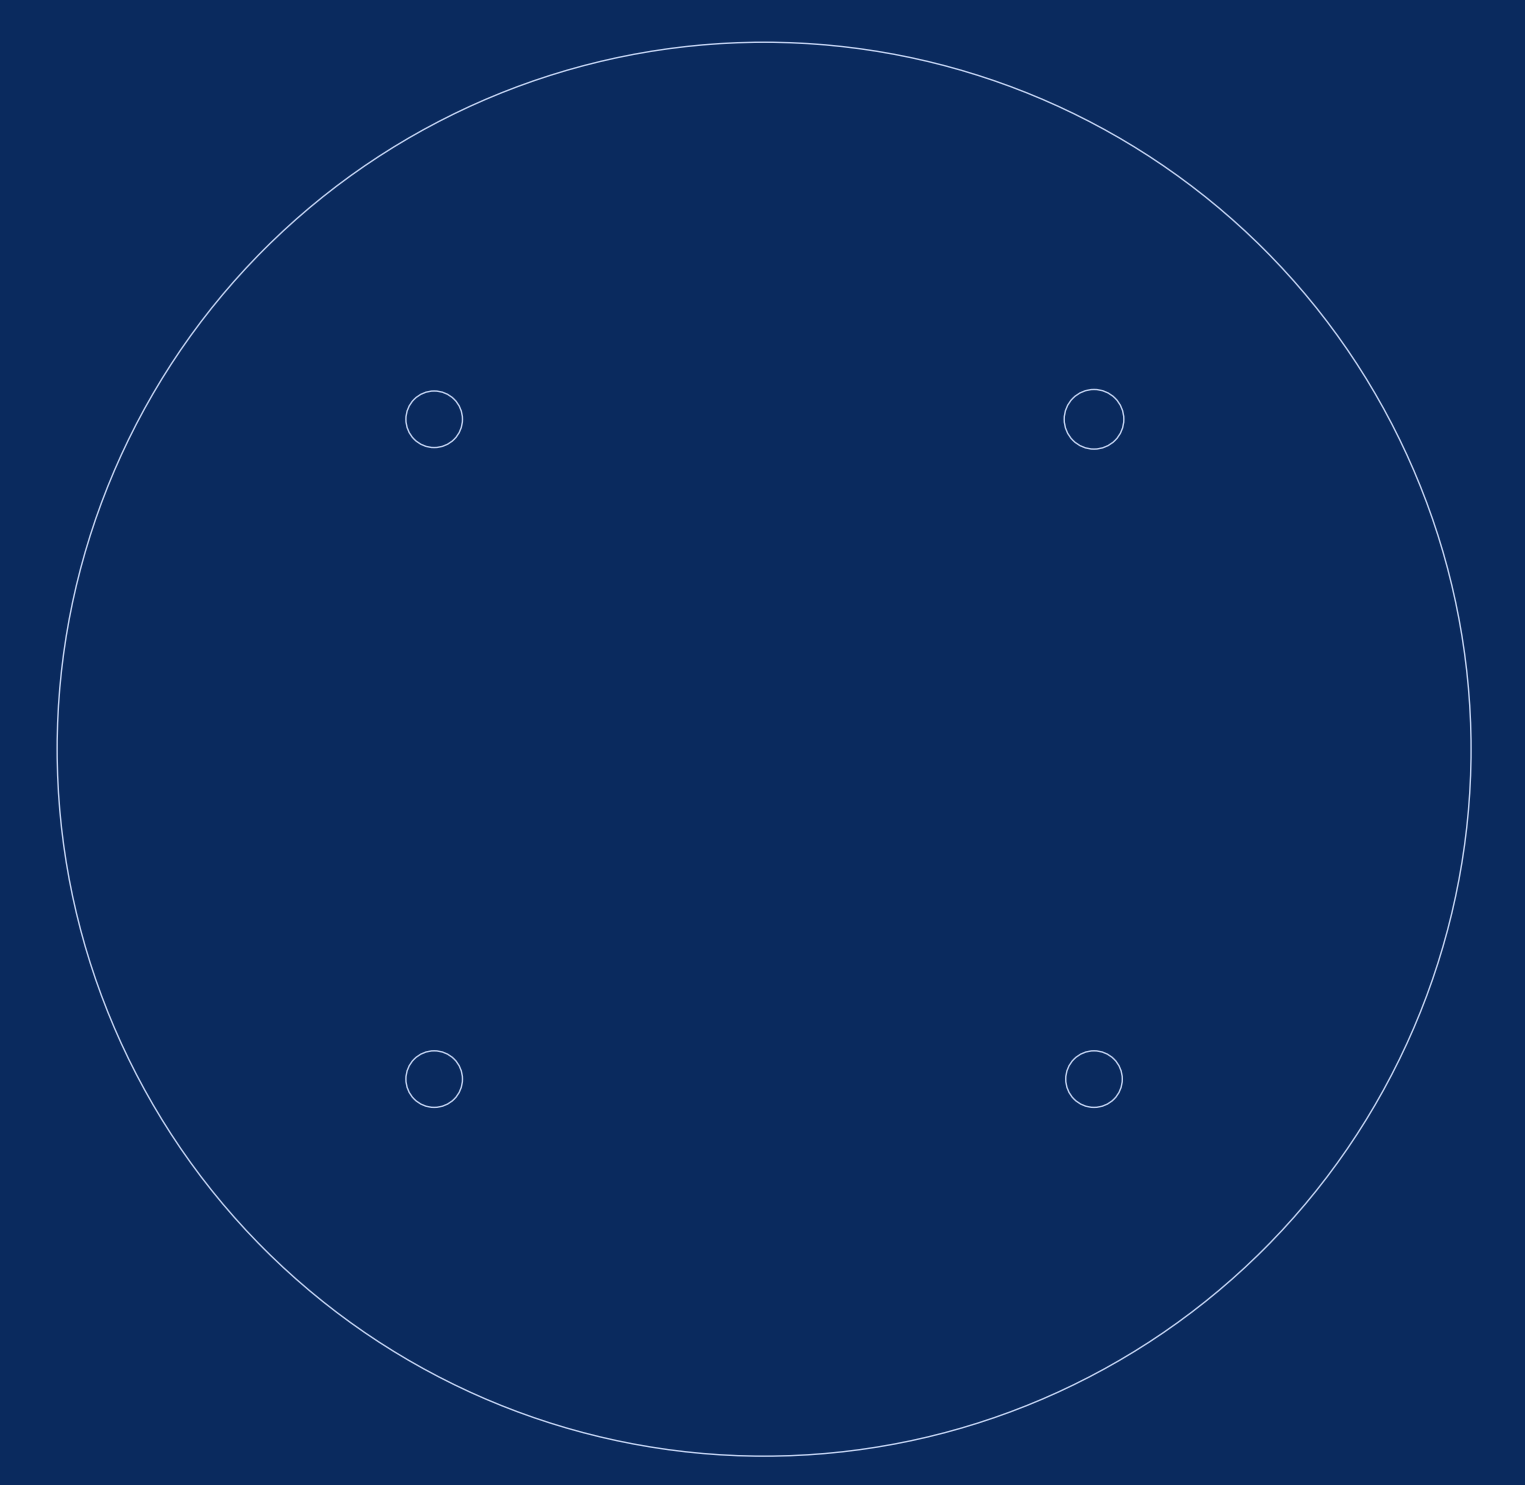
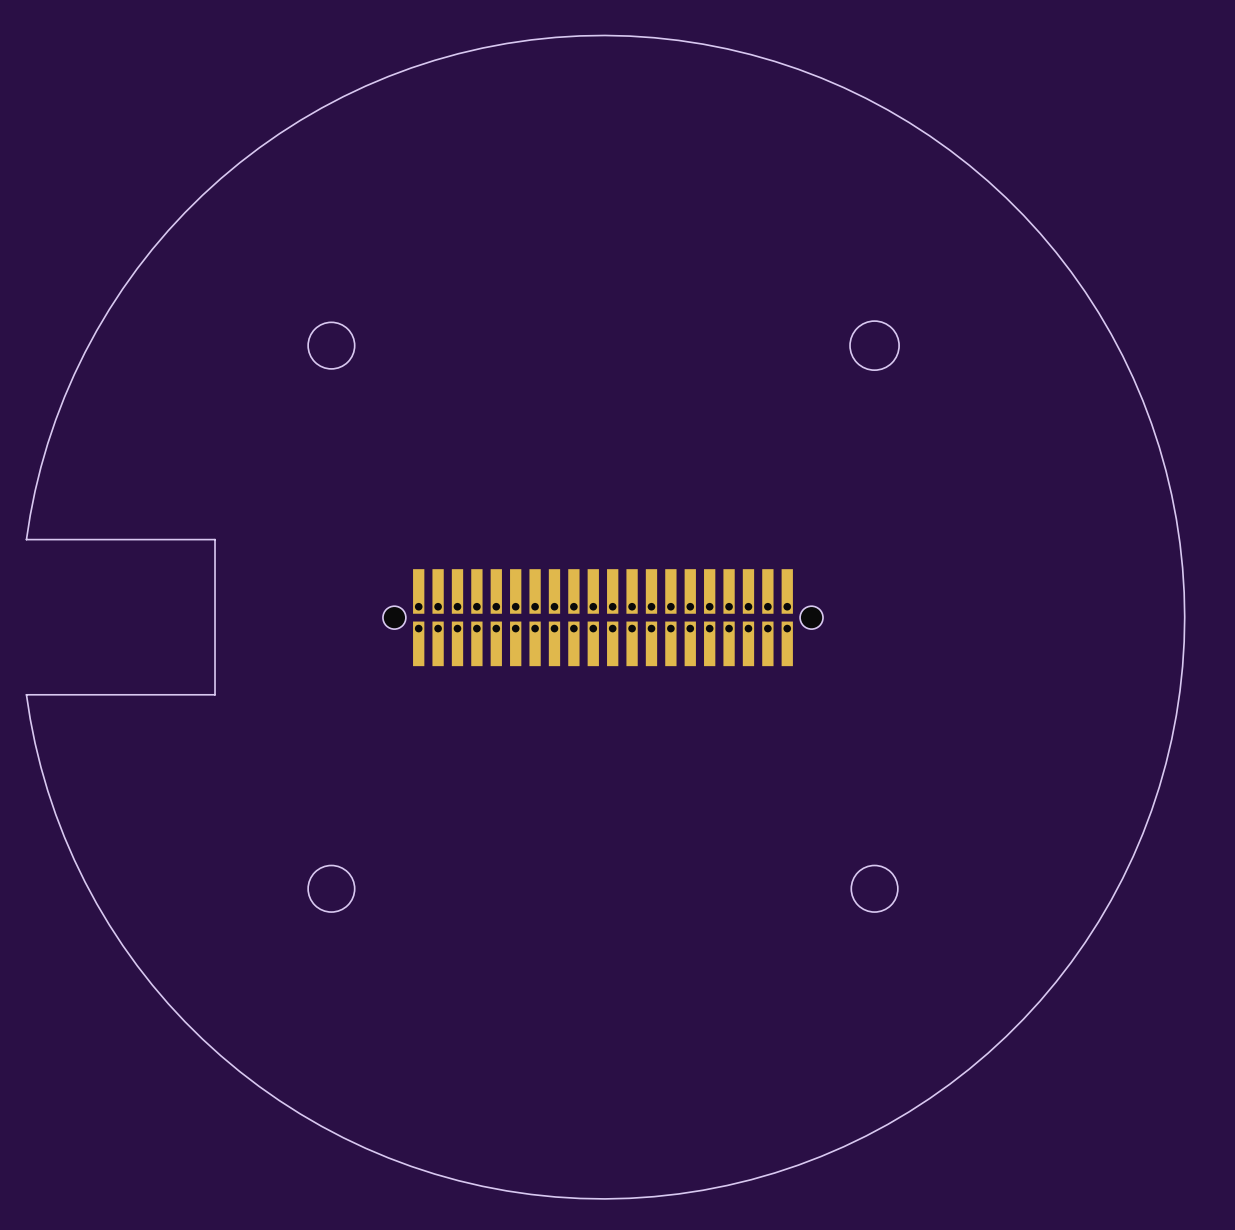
round board edge: [56, 41, 1472, 1457] -> none
board edge: none -> (215, 539) (215, 694) (26, 694) (40, 767) (64, 837) (96, 903) (137, 965) (185, 1021) (239, 1071) (300, 1113) (365, 1148) (411, 1166) (482, 1186) (531, 1194) (604, 1198) (654, 1196) (703, 1190) (774, 1172) (821, 1156) (887, 1124) (929, 1098) (969, 1069) (1006, 1036) (1040, 1000) (1085, 942) (1111, 900) (1142, 833) (1159, 787) (1171, 739) (1180, 690) (1184, 617) (1182, 567) (1176, 519) (1166, 470) (1151, 423) (1122, 355) (1098, 312) (1071, 271) (1023, 215) (969, 165) (929, 135) (887, 109) (821, 77) (774, 61) (727, 48) (678, 40) (604, 35) (531, 39) (458, 53) (388, 76) (321, 108) (259, 147) (202, 195) (168, 230) (137, 268) (109, 309) (85, 352) (64, 397) (47, 443) (35, 491) (26, 539) (215, 539)
part: none -> (602, 617)

